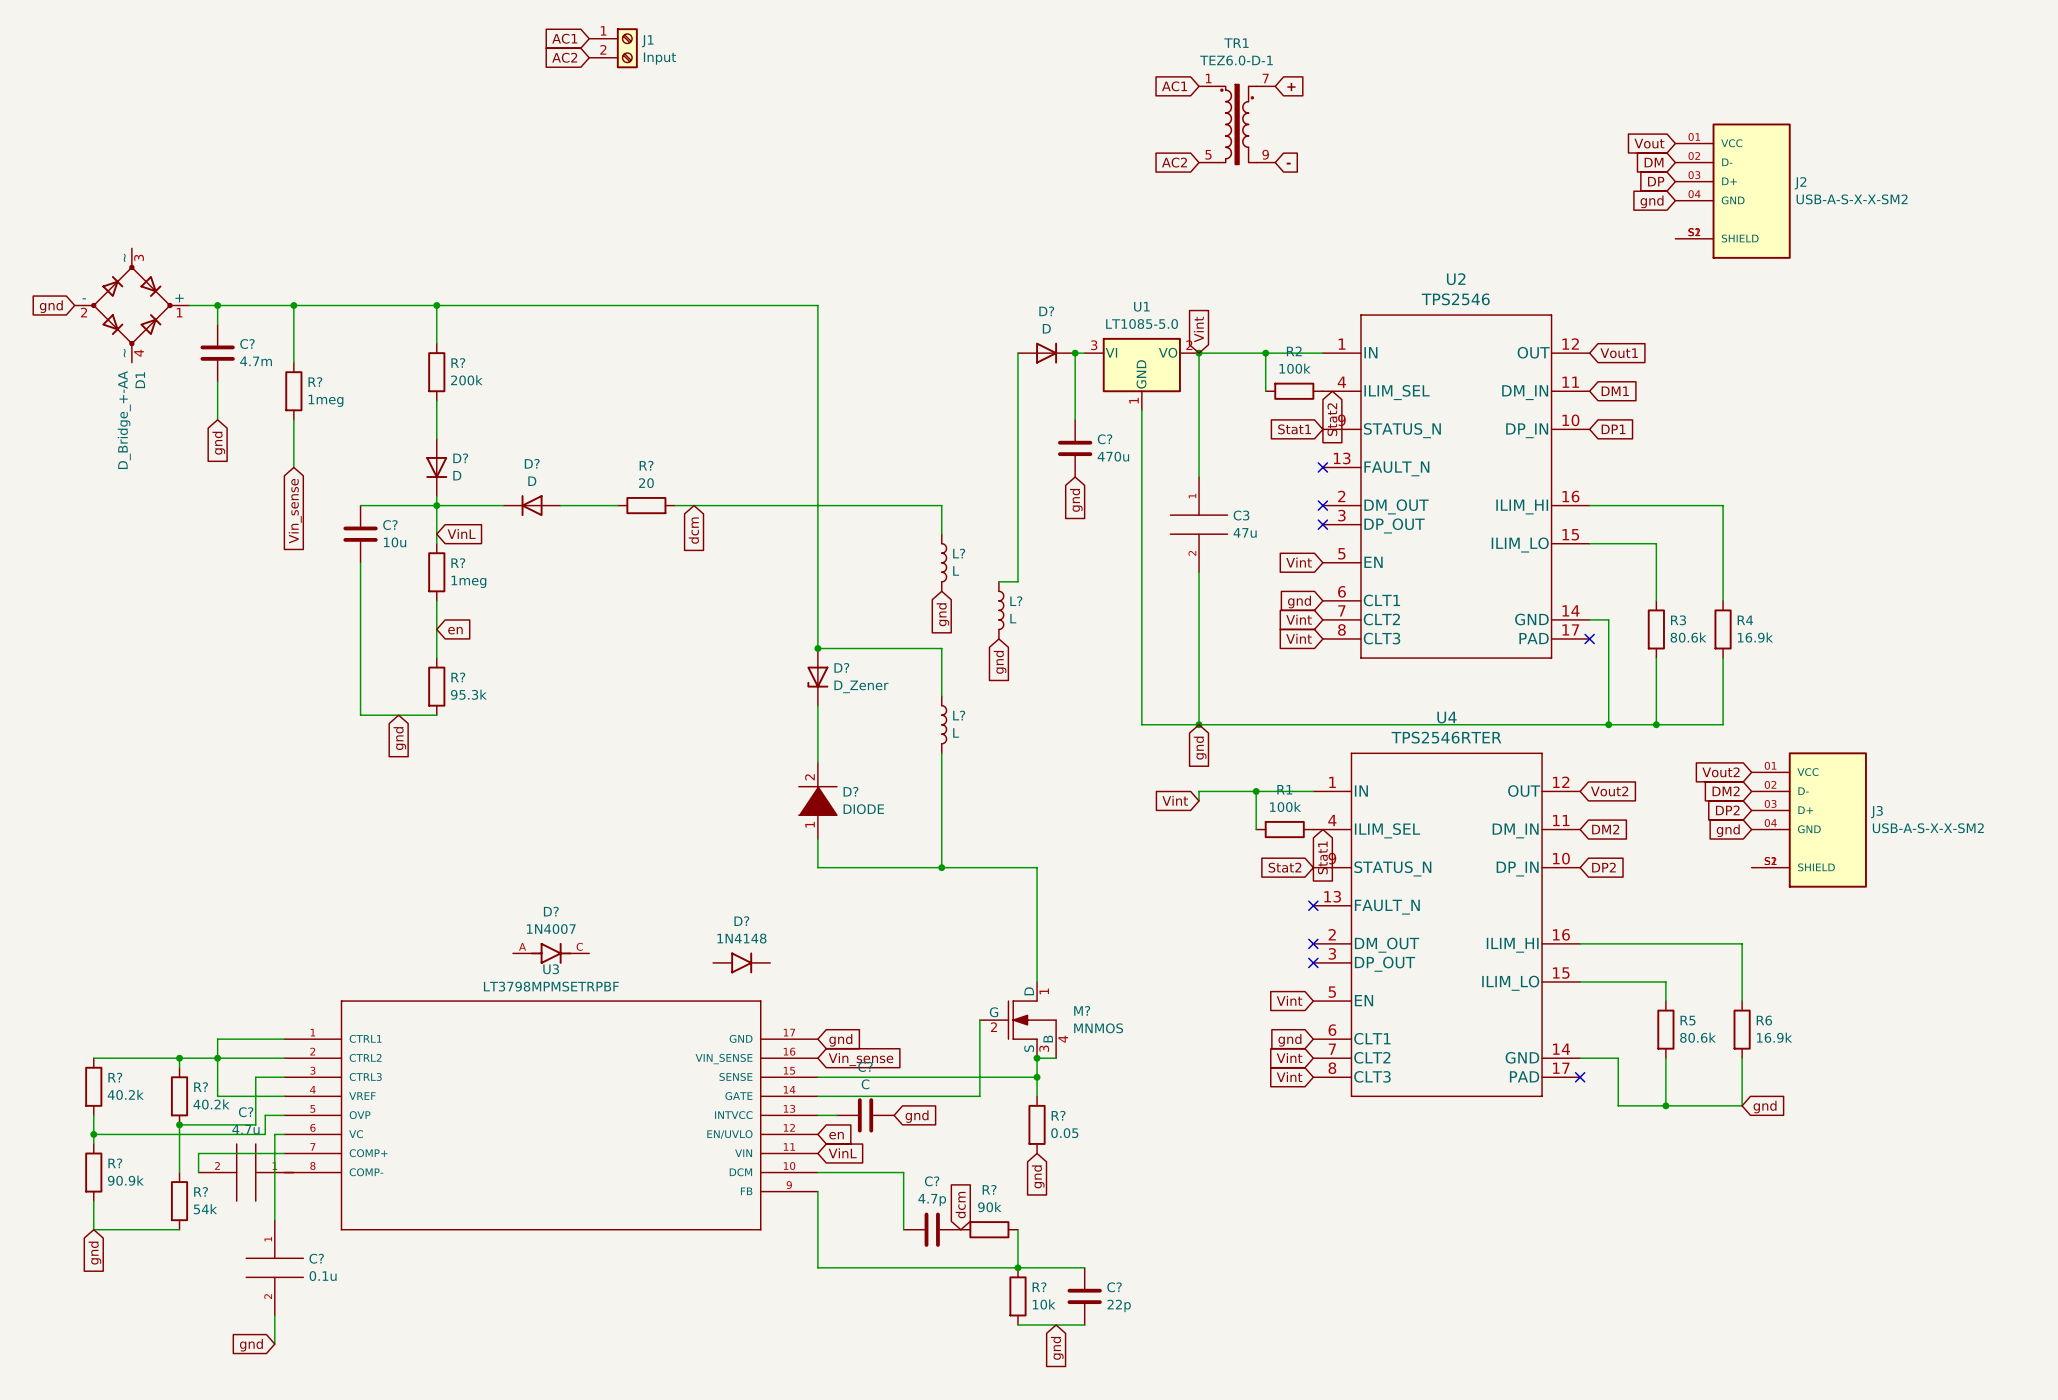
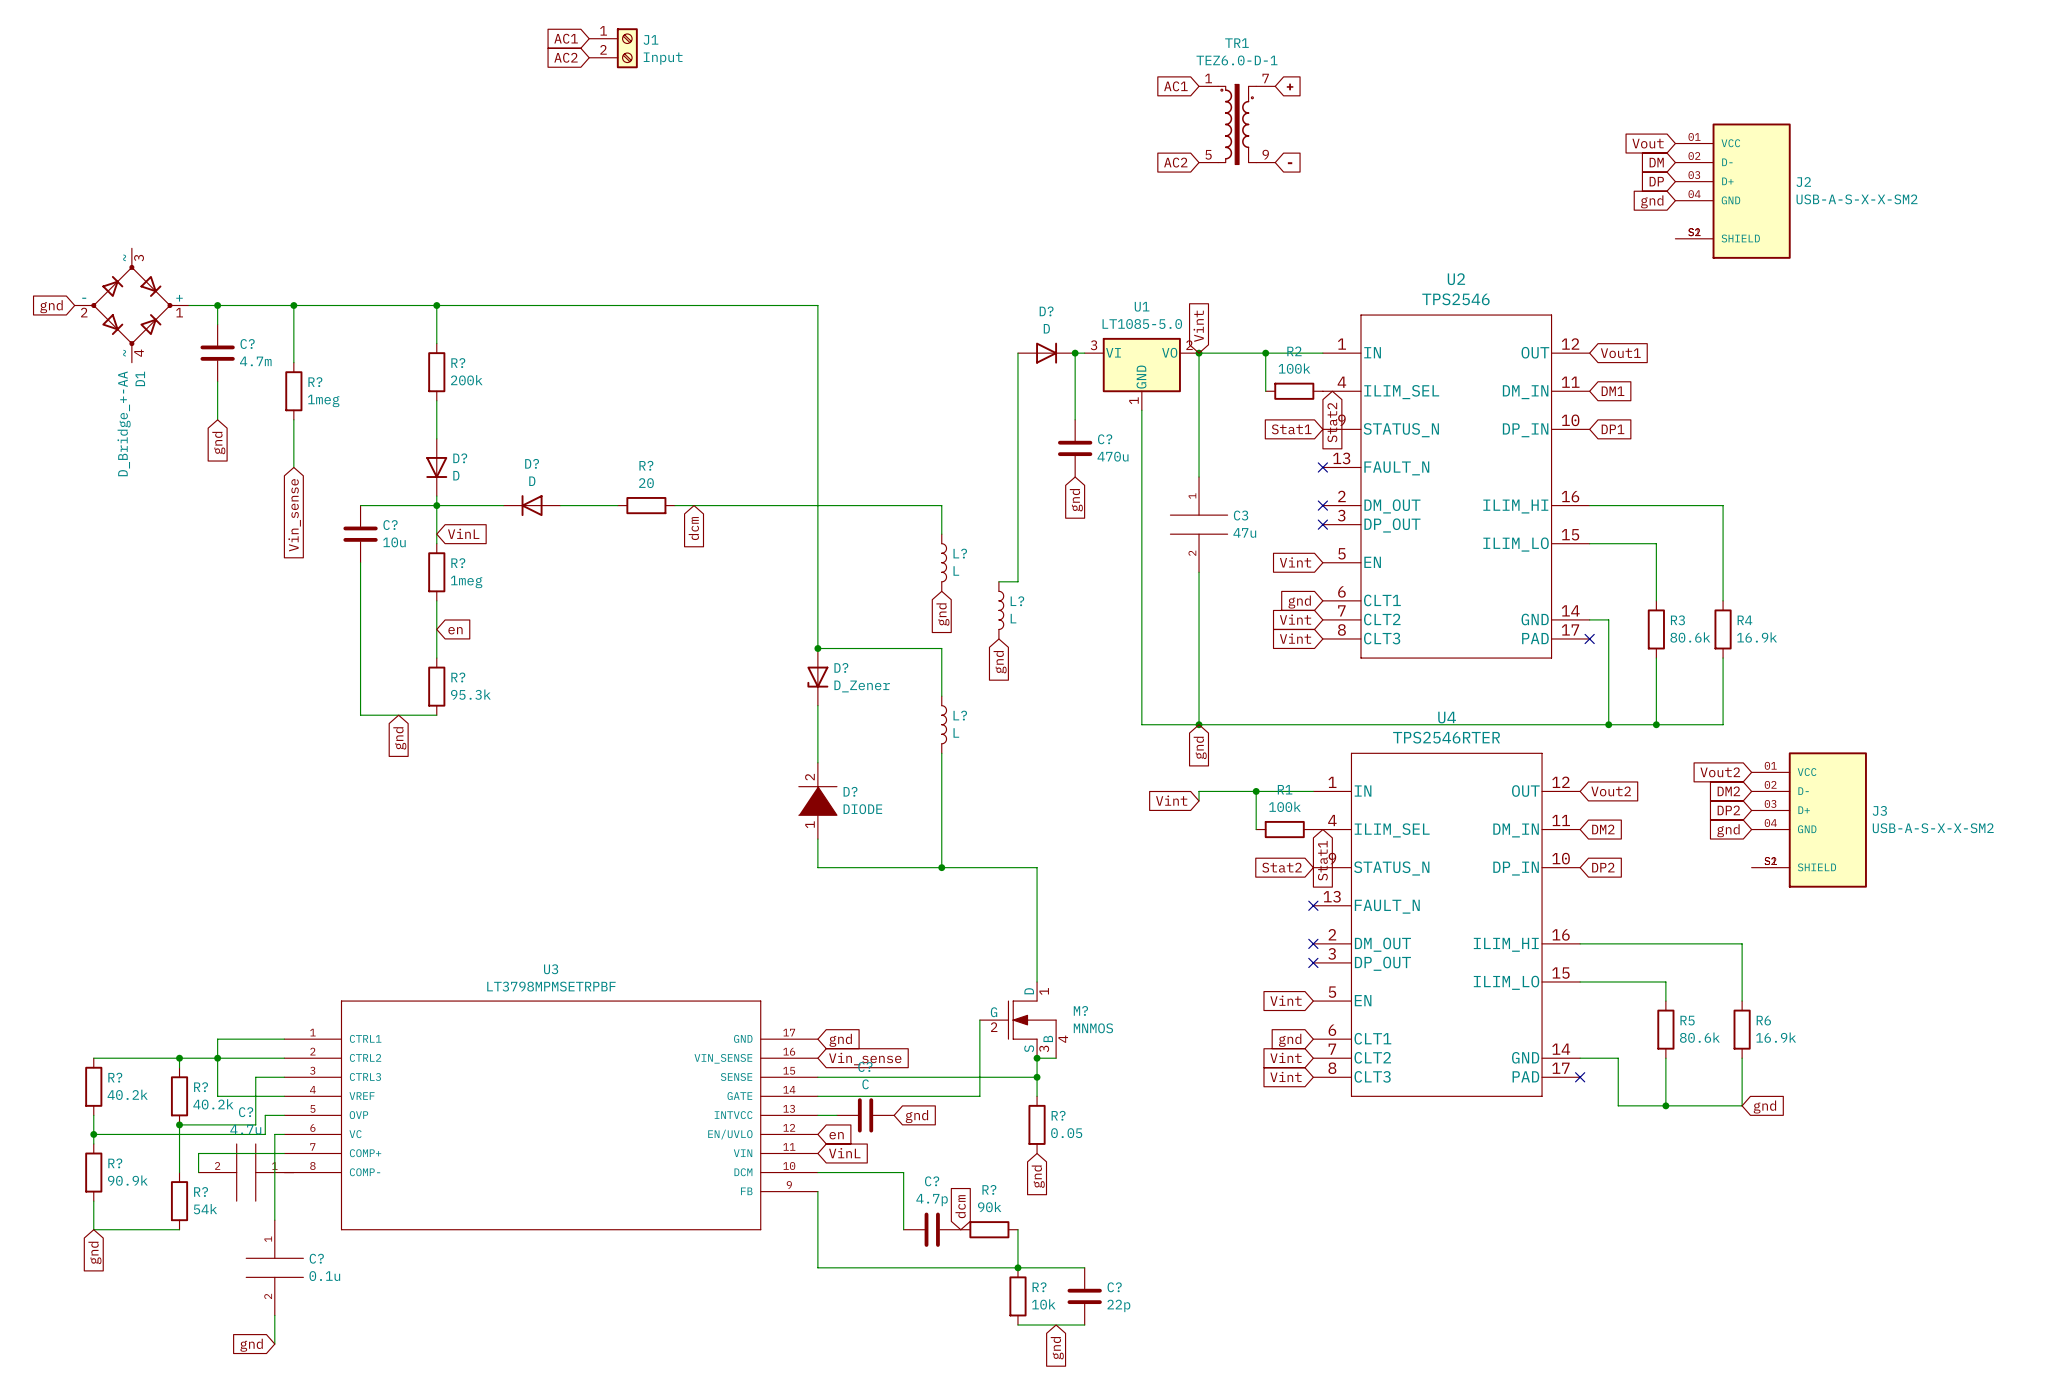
D?: 1N4007 (551, 953) -> none
D?: 1N4148 (741, 962) -> none

